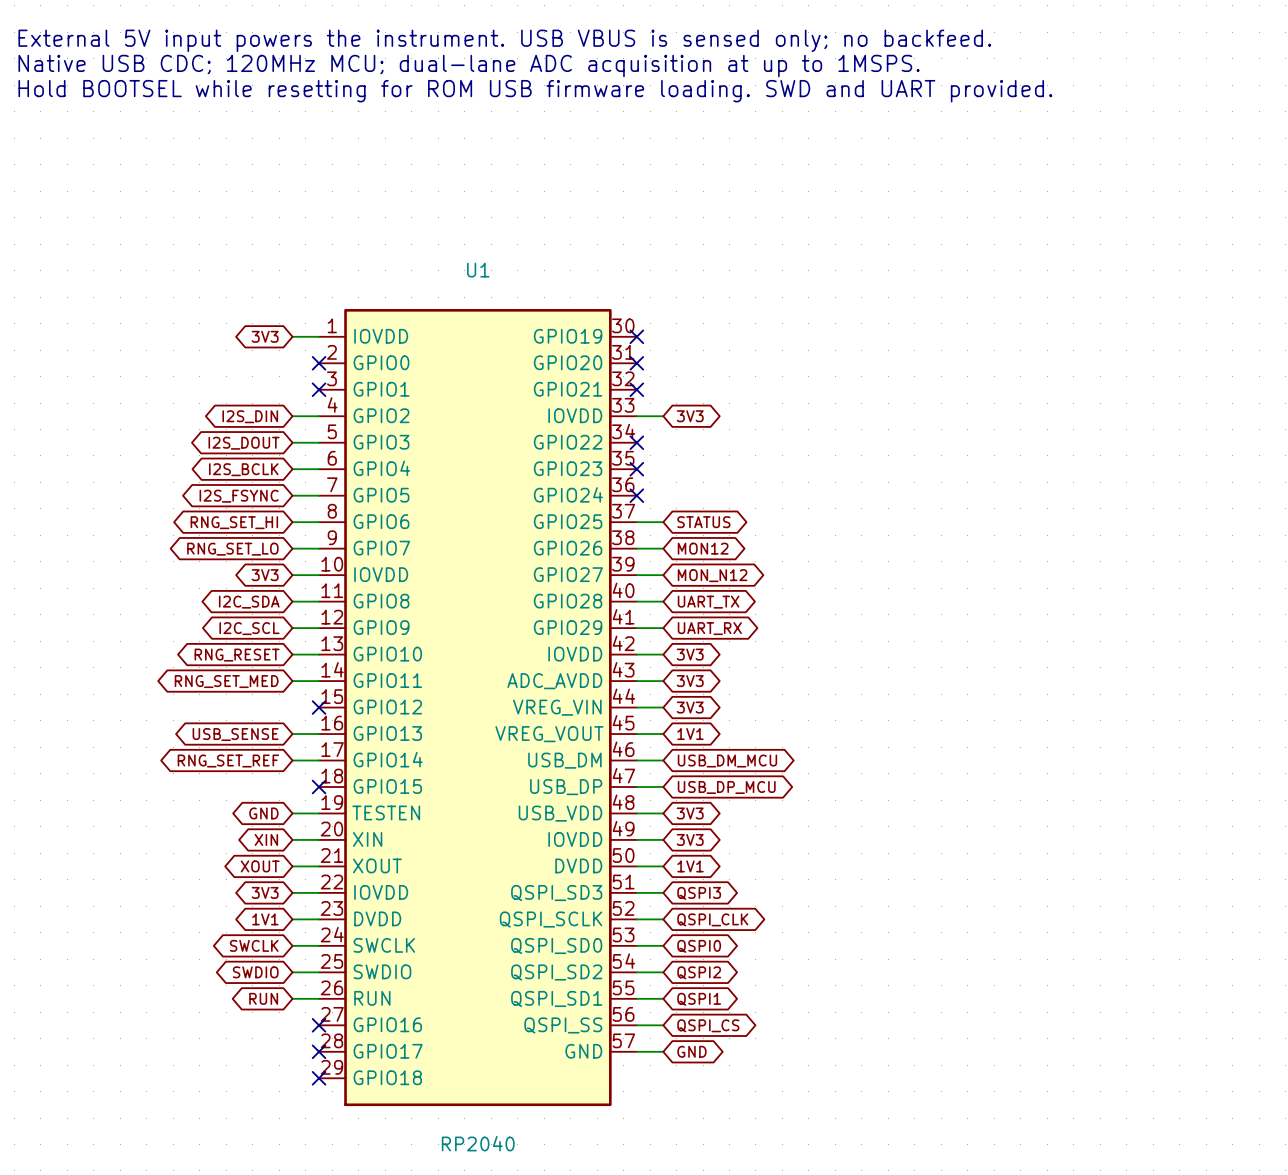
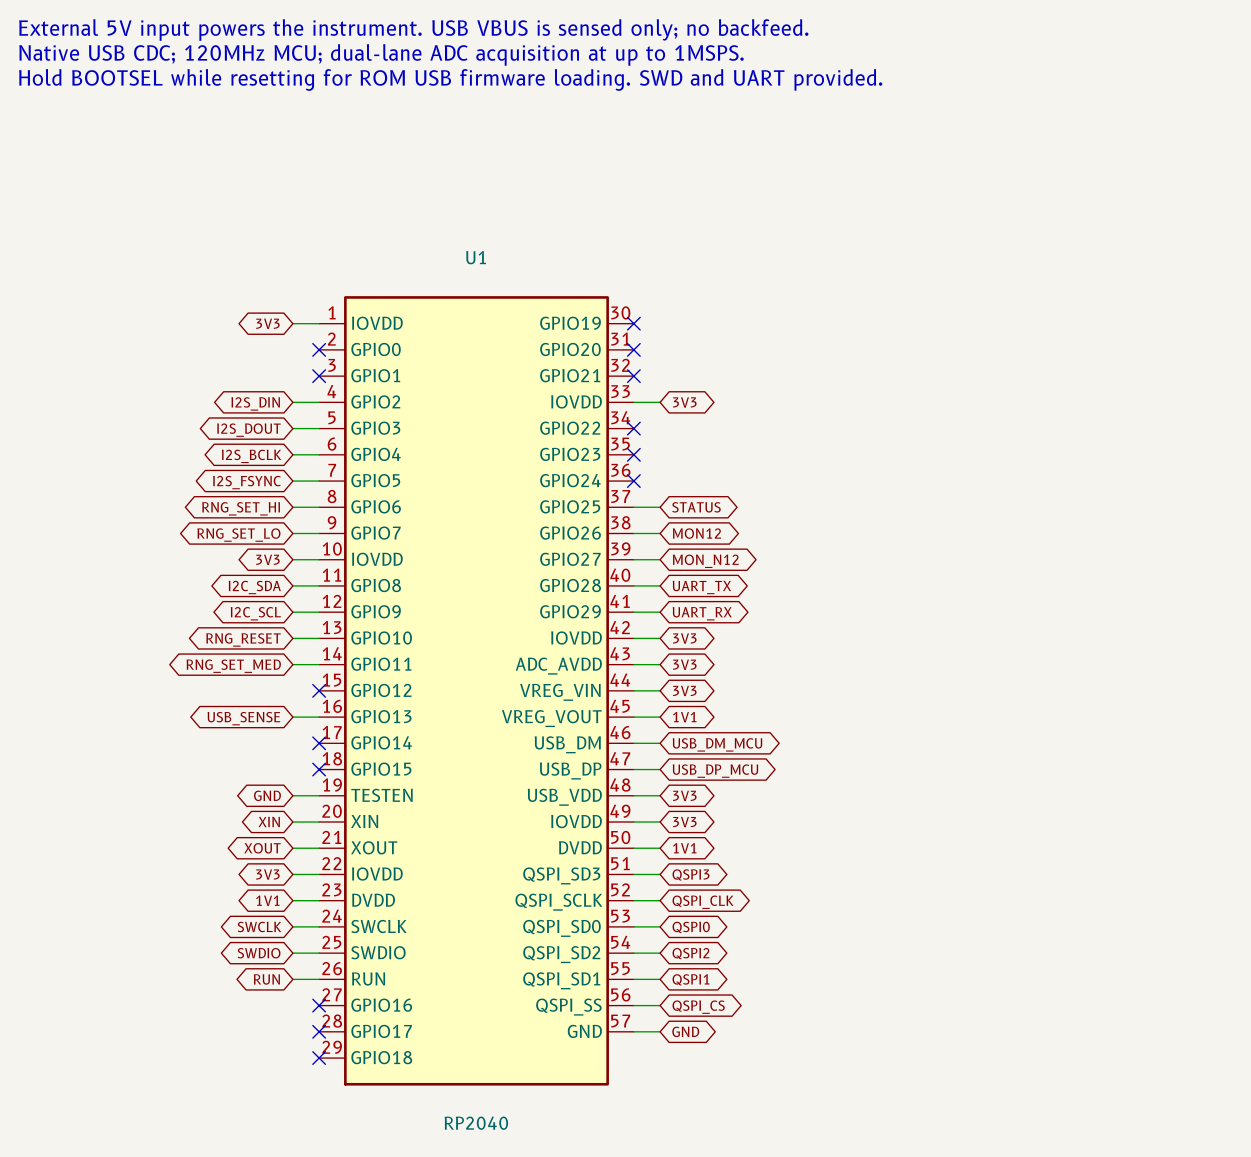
wire: (292, 760) (319, 760) -> none
no-connect mark: none -> (319, 743)
global label: RNG_SET_REF (228, 761) -> none

